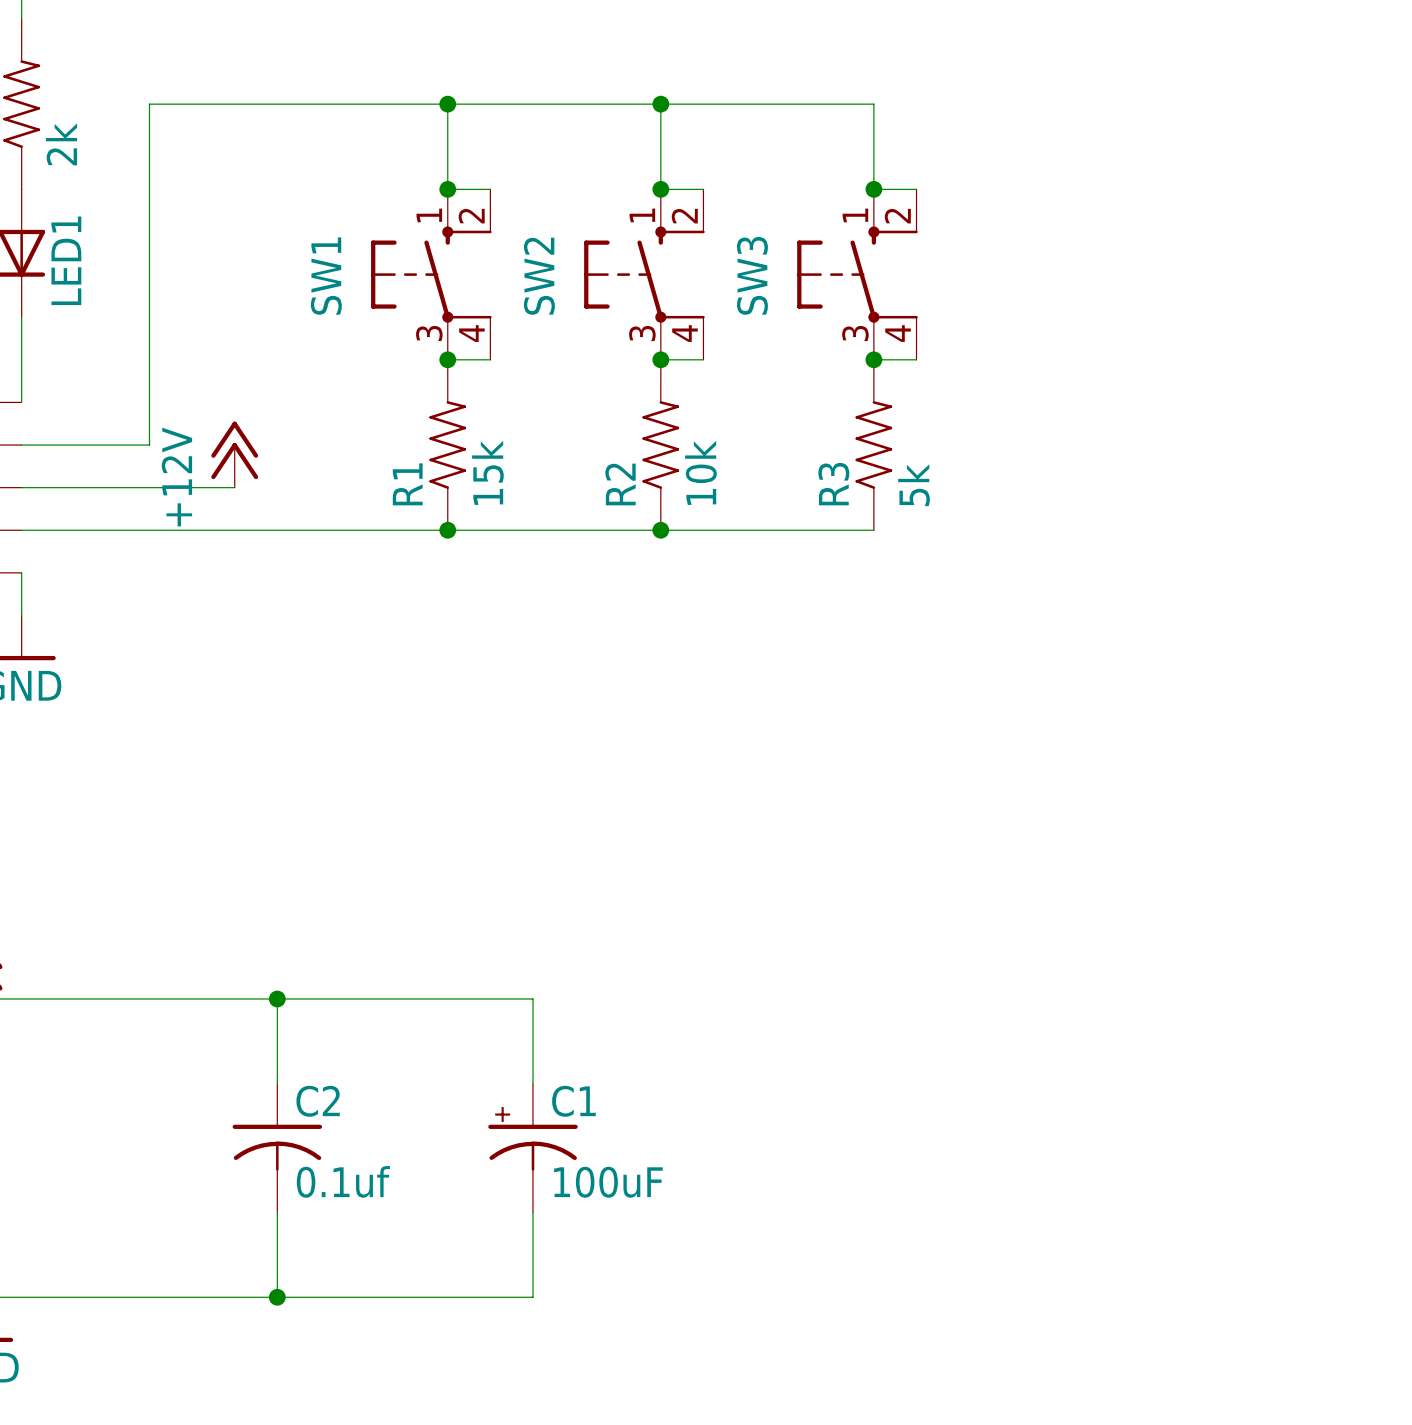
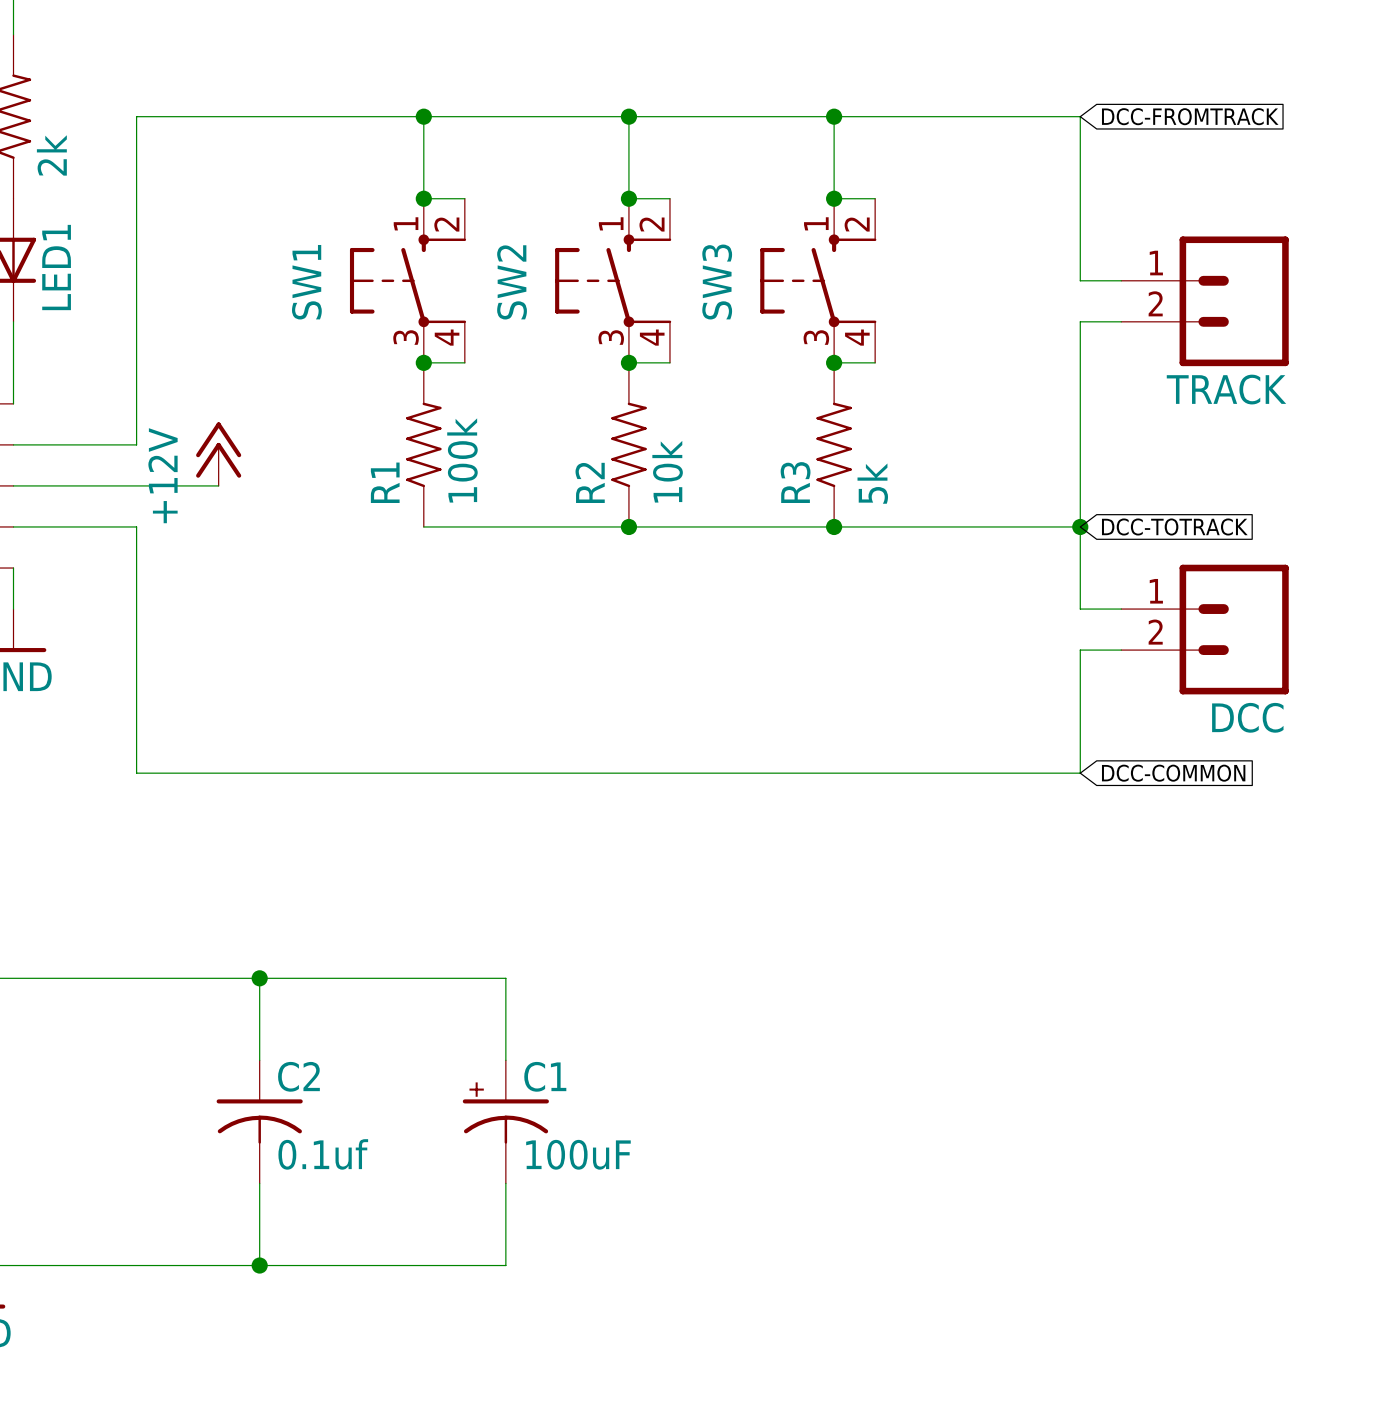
wire: none -> (834, 116) (1080, 116) (1080, 280) (1121, 280)
junction: none -> (834, 116)
global label: none -> DCC-FROMTRACK (1190, 116)
TRACK: none -> (1205, 301)
wire: none -> (1121, 321) (1080, 321) (1080, 609) (1121, 609)
R1 value: 15k (487, 472) -> 100k (462, 460)
wire: (149, 530) (447, 530) -> (136, 526) (136, 773) (1080, 773) (1080, 650) (1121, 650)
junction: (447, 530) -> none
wire: none -> (834, 526) (1080, 526)
junction: none -> (834, 526)
junction: none -> (1080, 526)
global label: none -> DCC-TOTRACK (1174, 526)
DCC: none -> (1205, 629)
global label: none -> DCC-COMMON (1173, 773)

